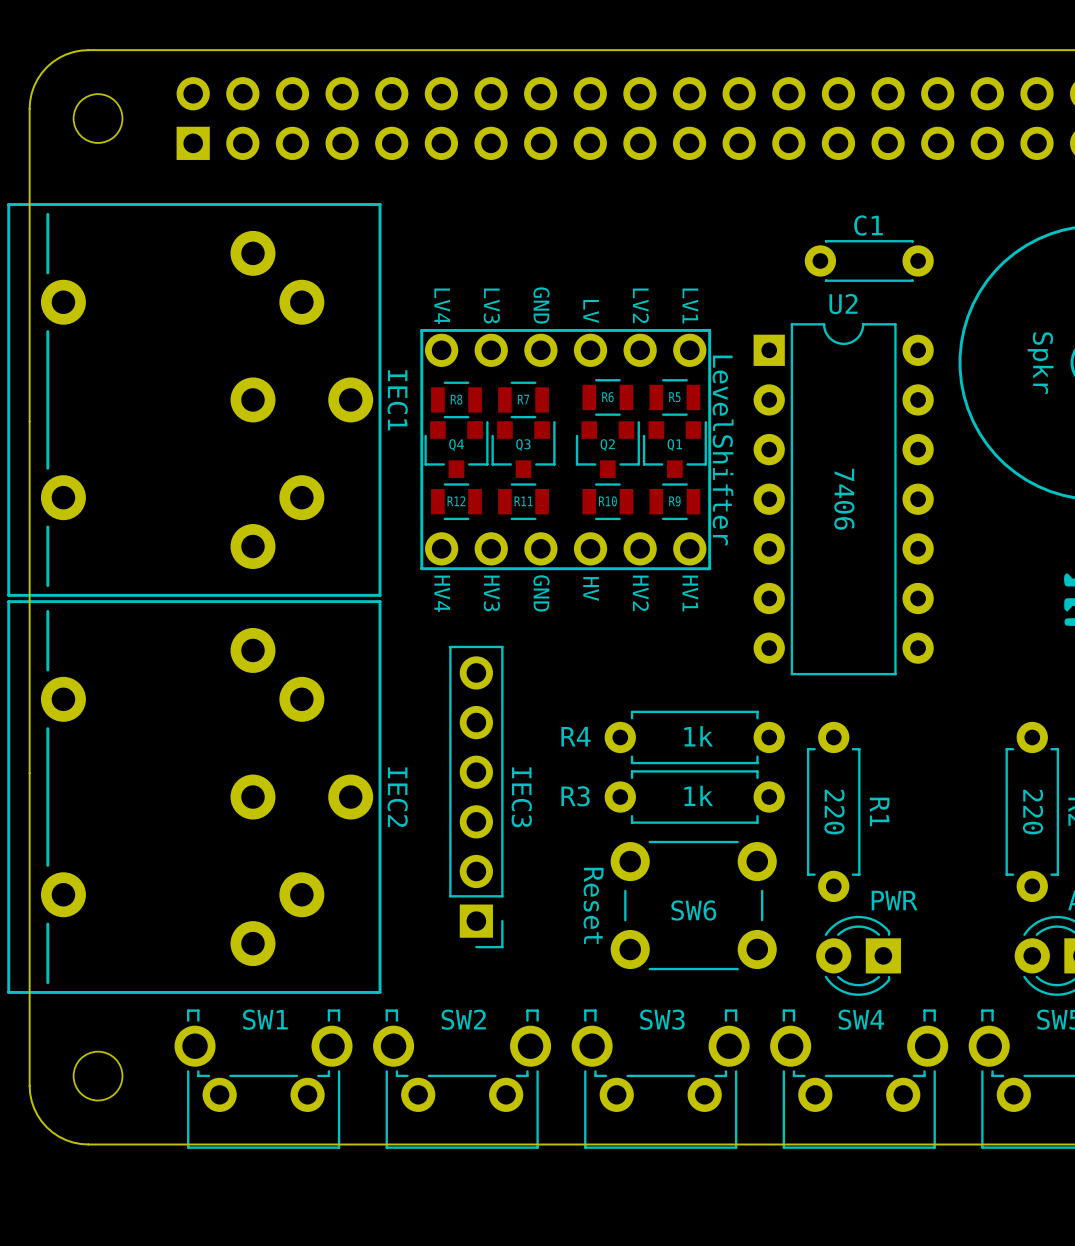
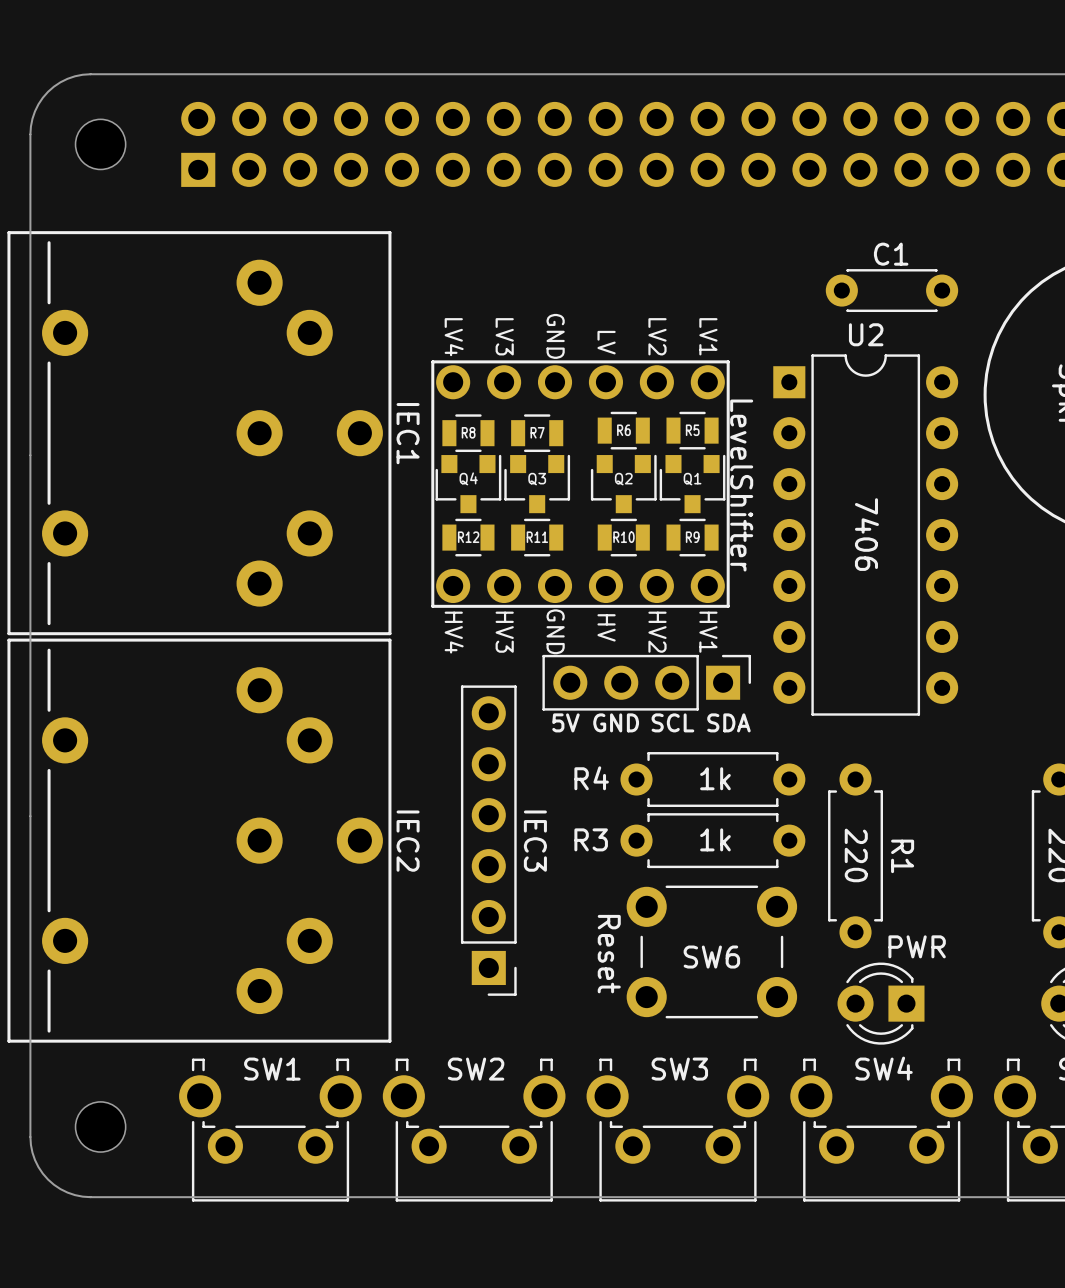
part: none -> (646, 682)
text: none -> 5V (565, 722)
text: none -> GND (616, 722)
text: none -> SCL (672, 722)
text: none -> SDA (728, 722)

